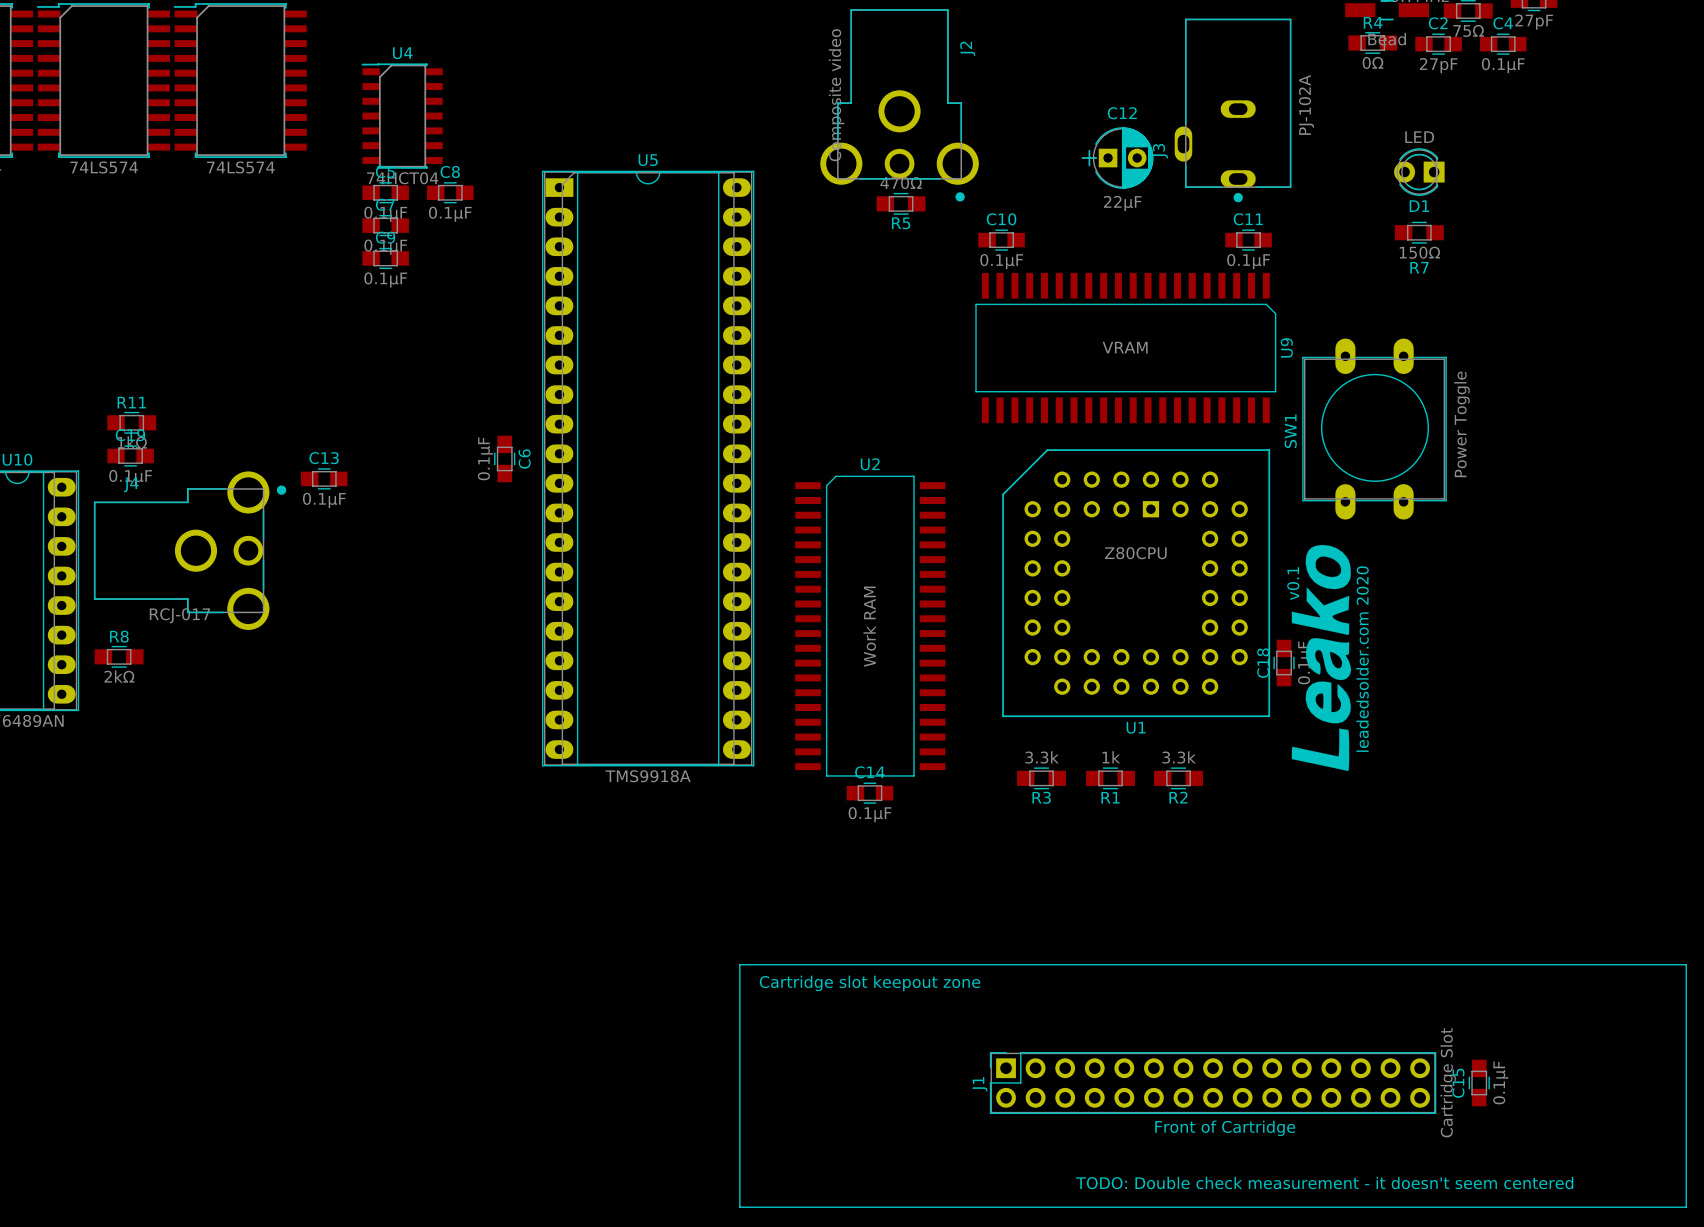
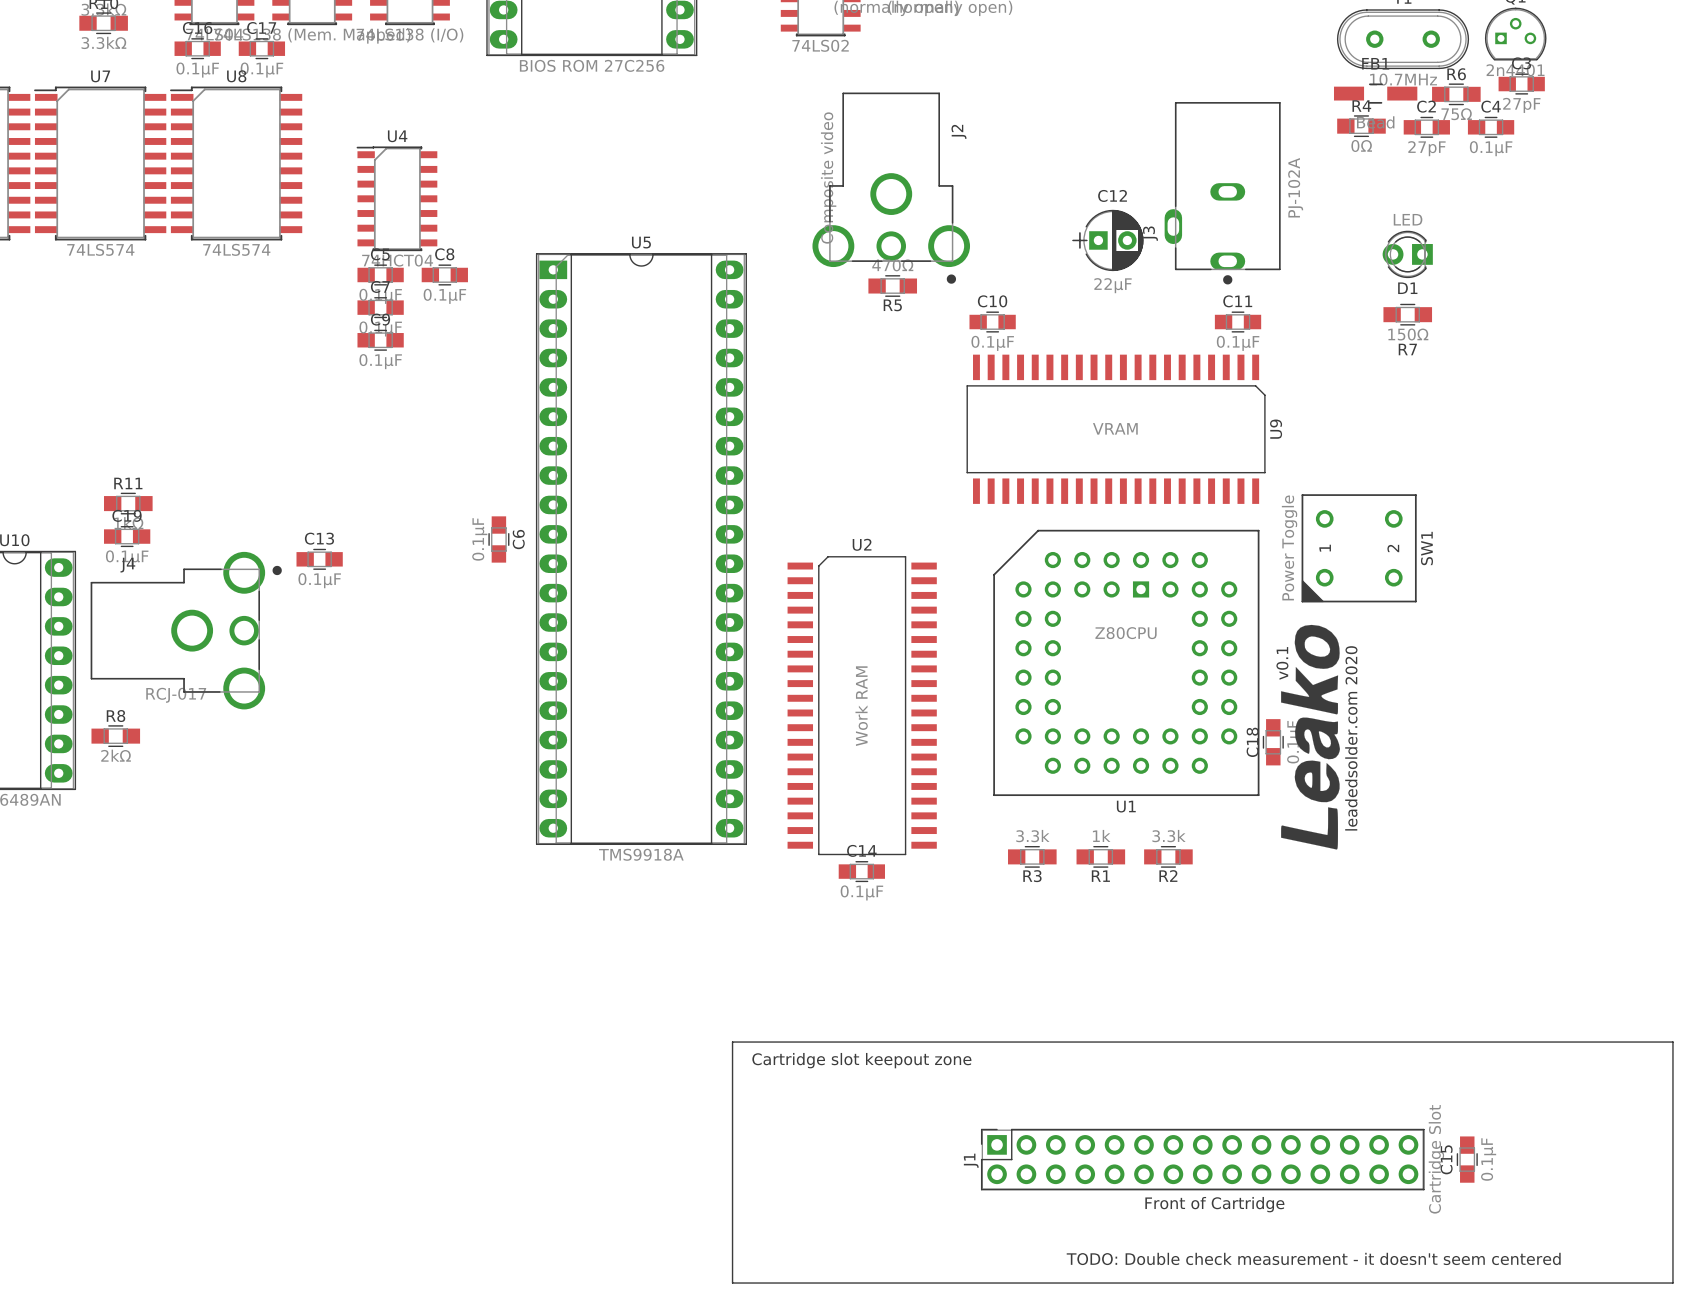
SW1 footprint: [1302, 338, 1447, 520] -> [1301, 494, 1417, 603]
SW1 value position: Power Toggle (1462, 424) -> Power Toggle (1289, 547)
SW1 name position: SW1 (1290, 431) -> SW1 (1426, 548)

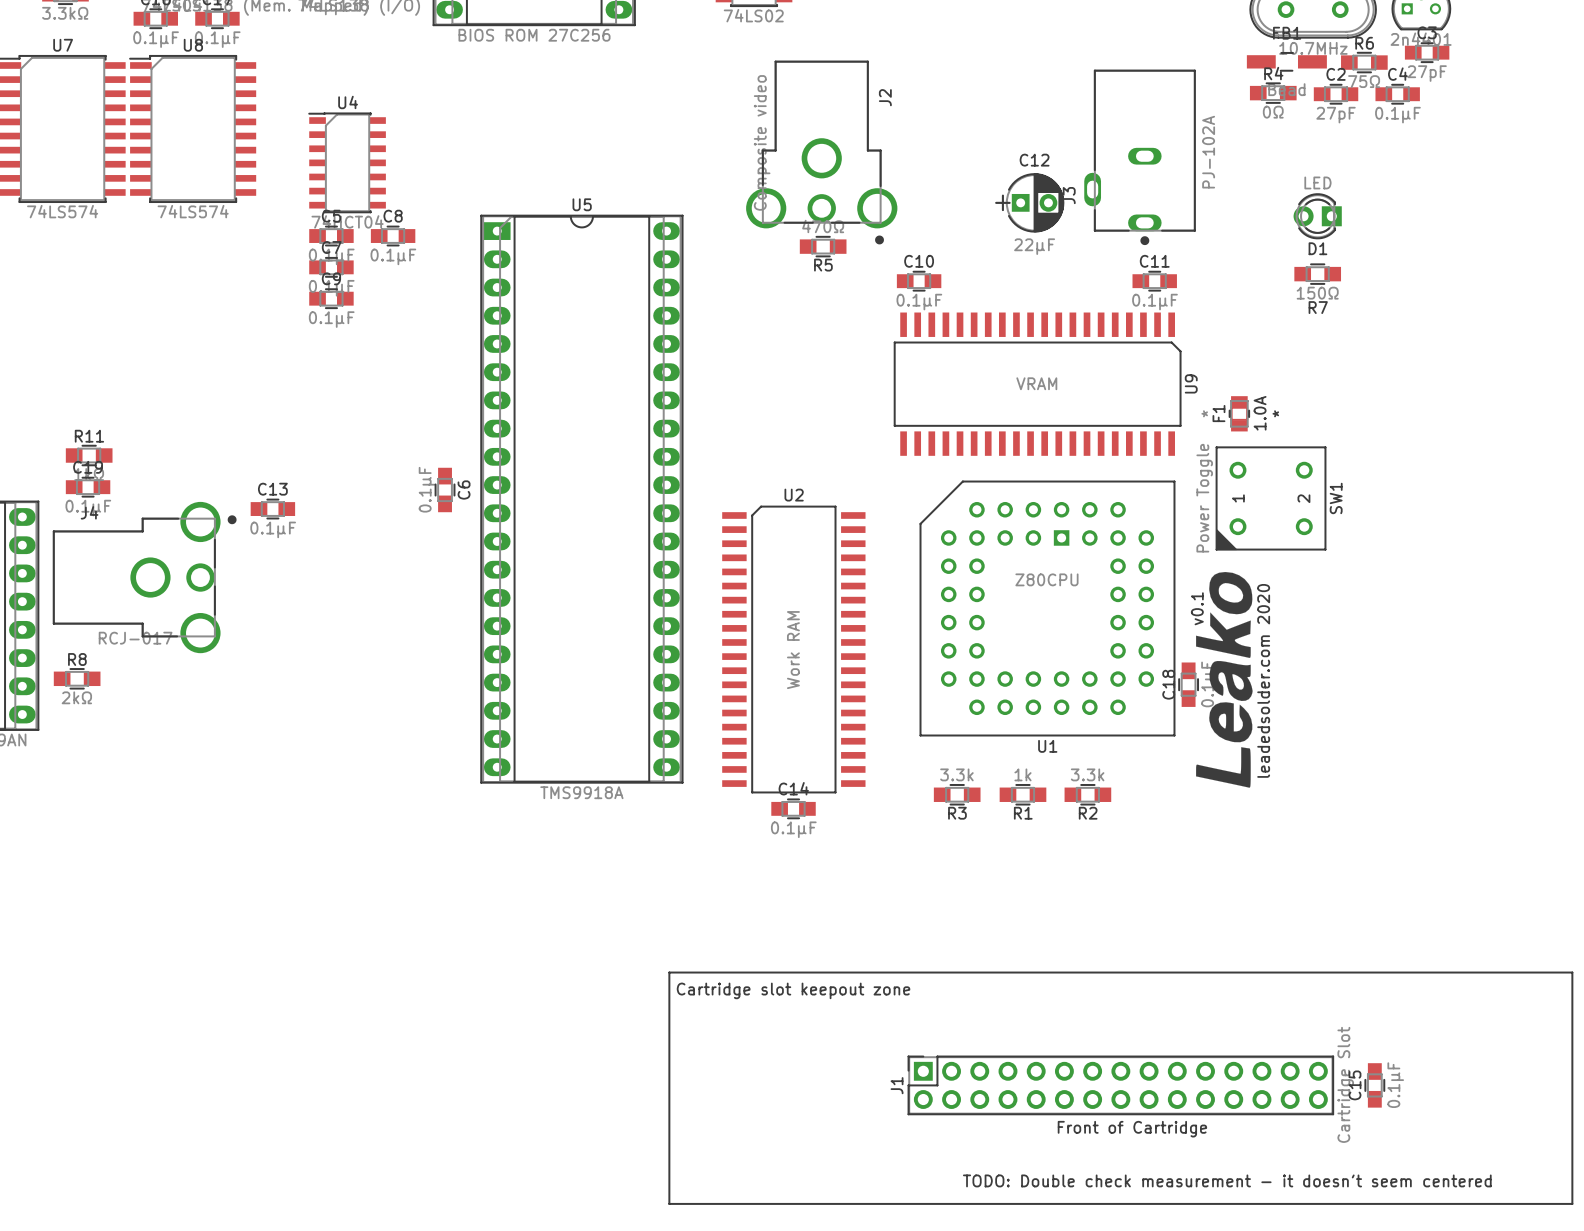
F1: none -> 1.0A (1239, 413)

